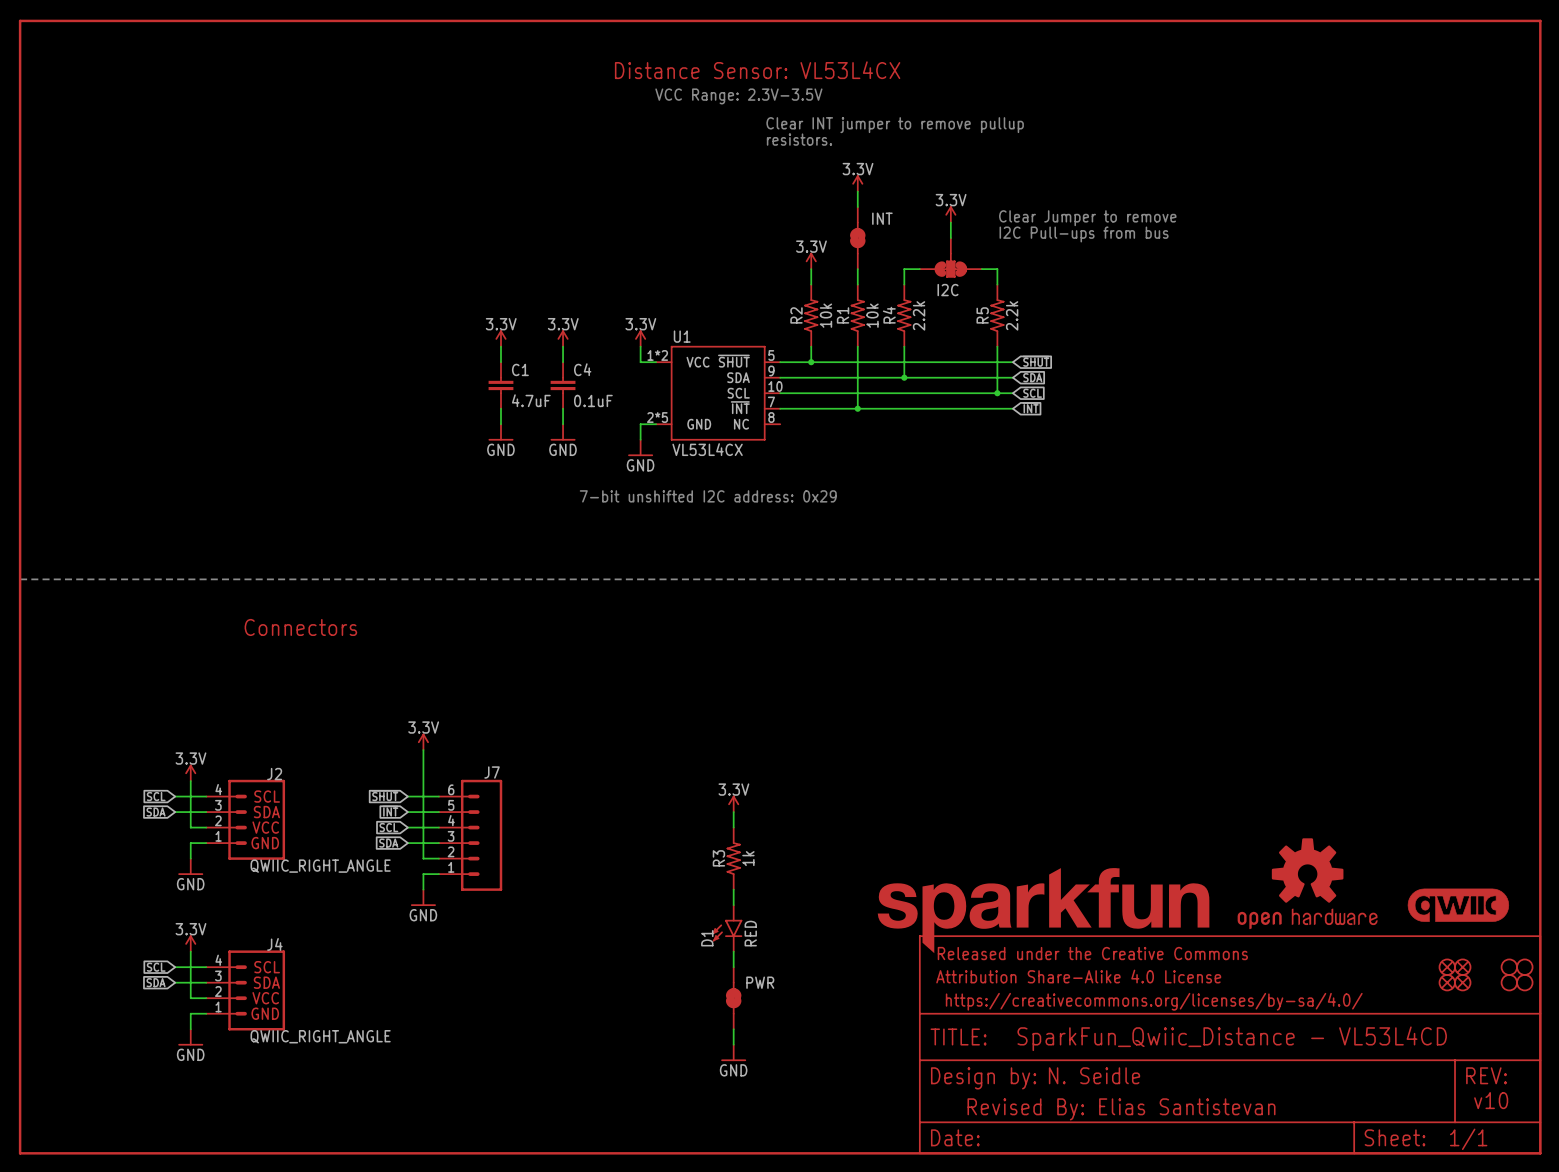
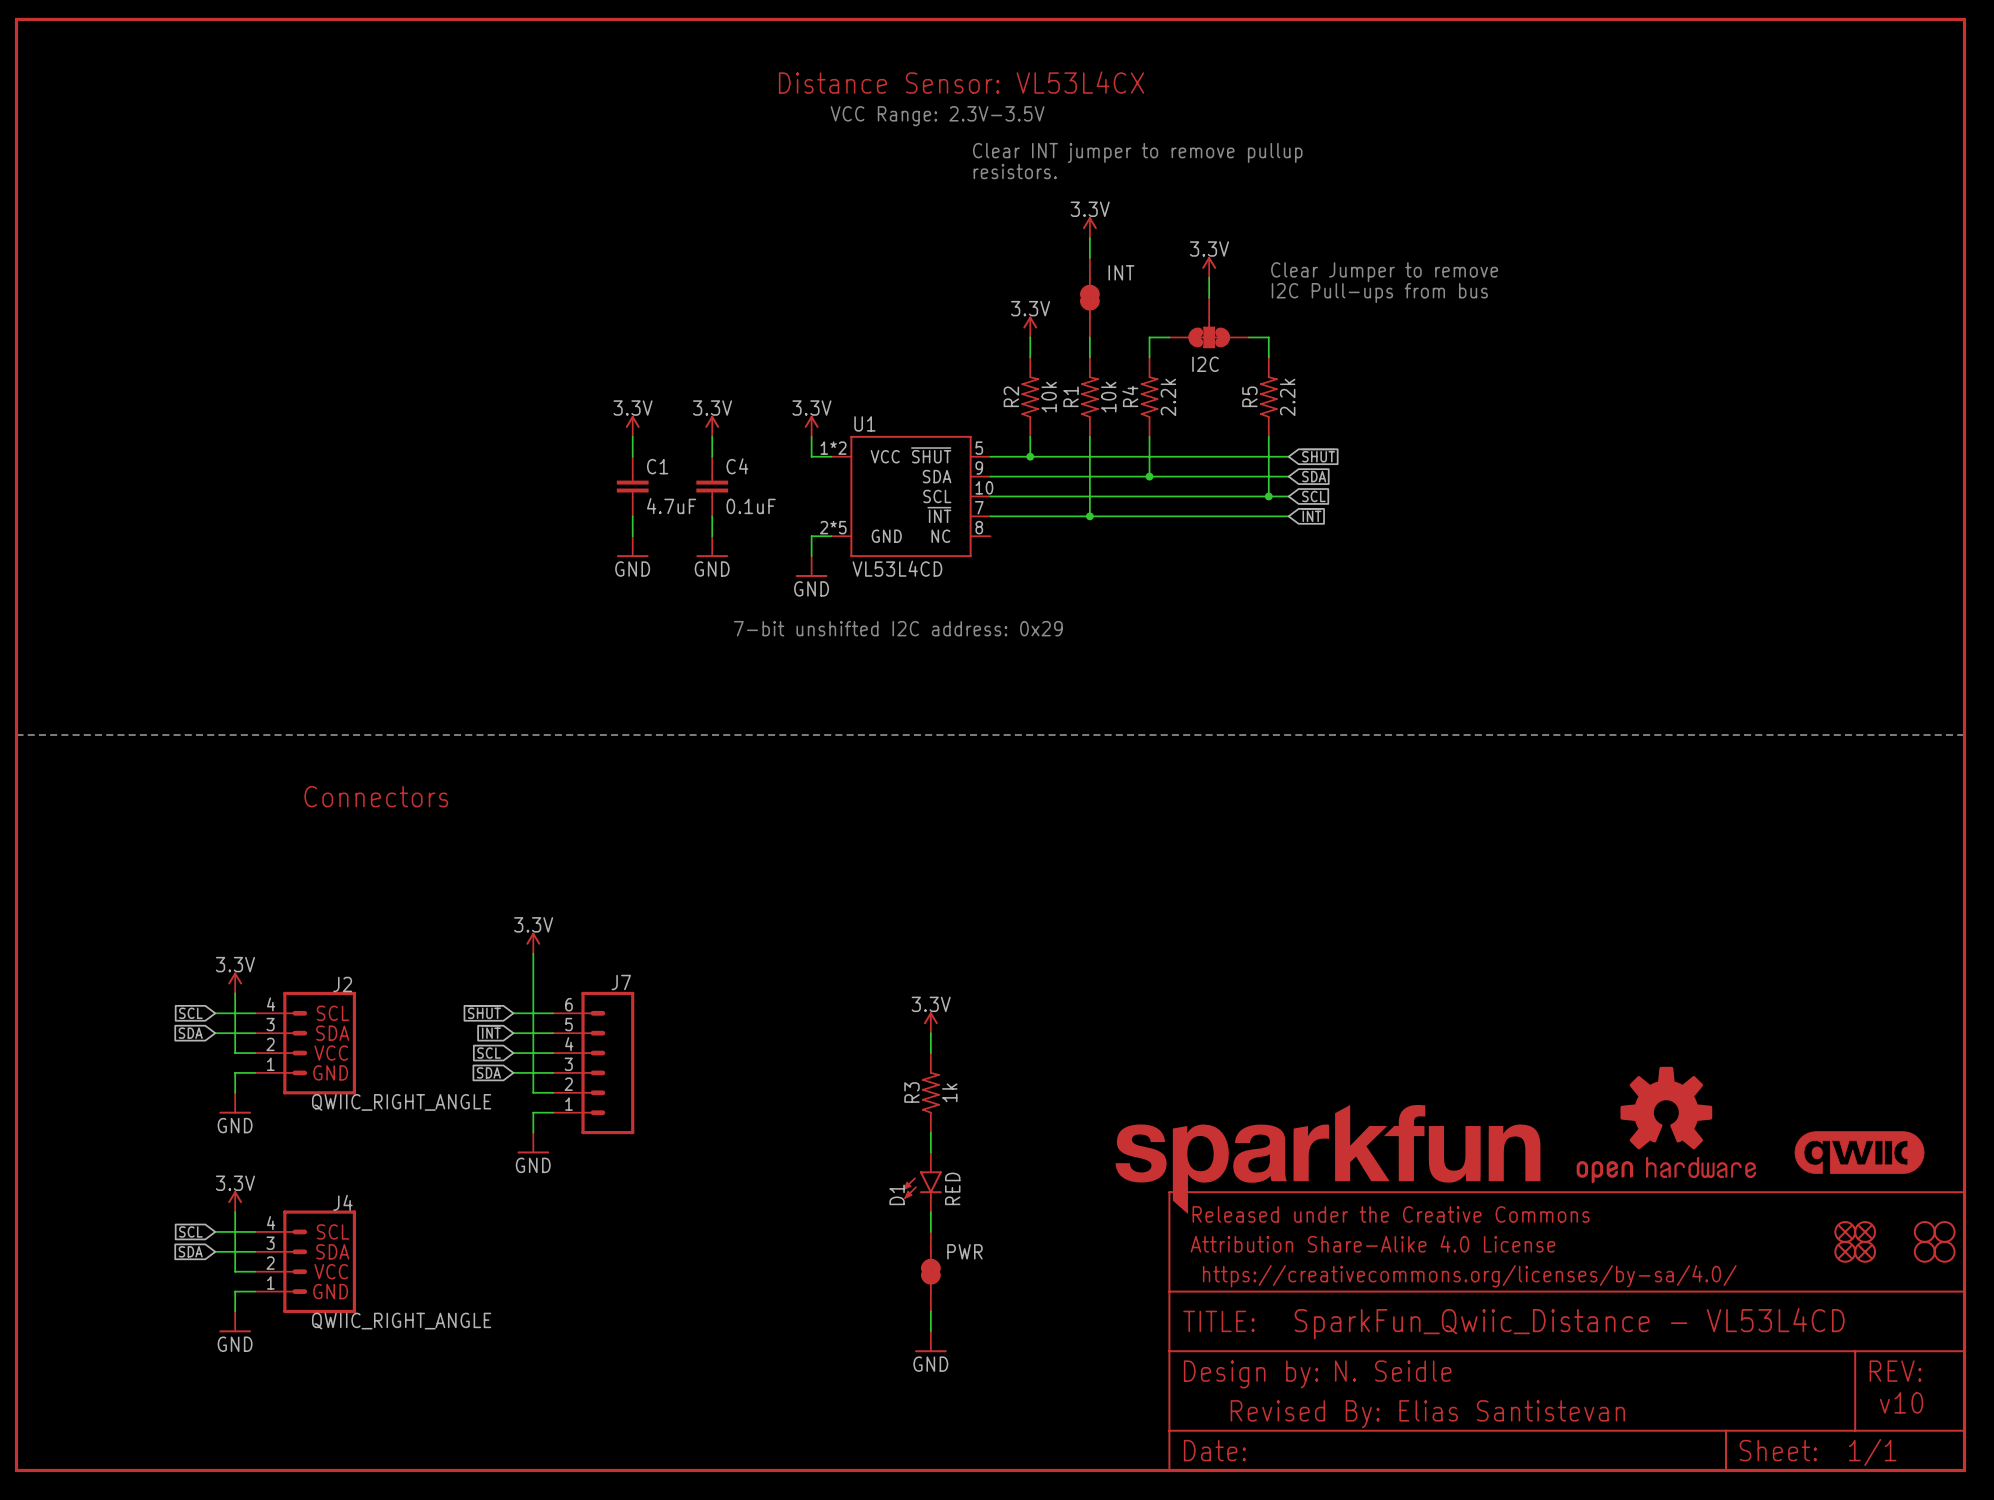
U1 value: VL53L4CX (707, 449) -> VL53L4CD (897, 568)

